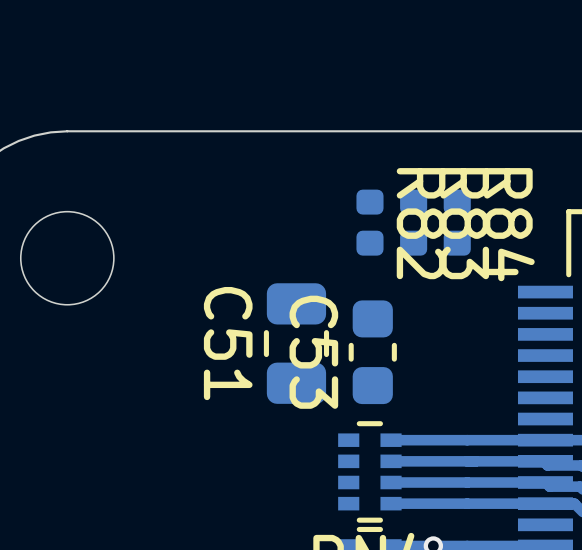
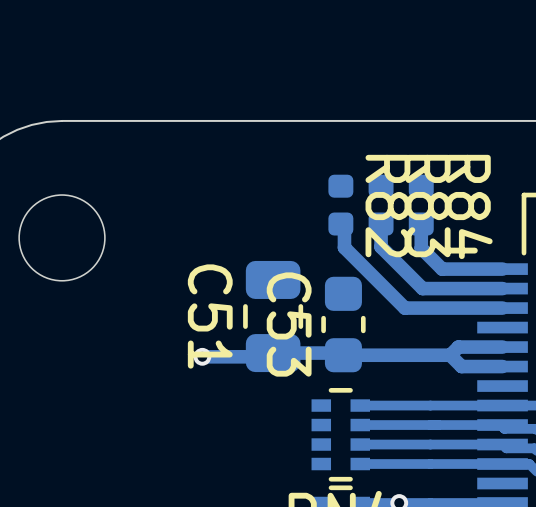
track: none -> (340, 224) (344, 227) (344, 247) (404, 308) (502, 308)
track: none -> (381, 224) (381, 247) (422, 288) (502, 288)
track: none -> (421, 224) (421, 248) (442, 269) (502, 269)
track: none -> (502, 347) (458, 347) (450, 355)
track: none -> (450, 355) (273, 353) (269, 356) (202, 356)
track: none -> (450, 355) (461, 366) (502, 366)
via: none -> (202, 356)

